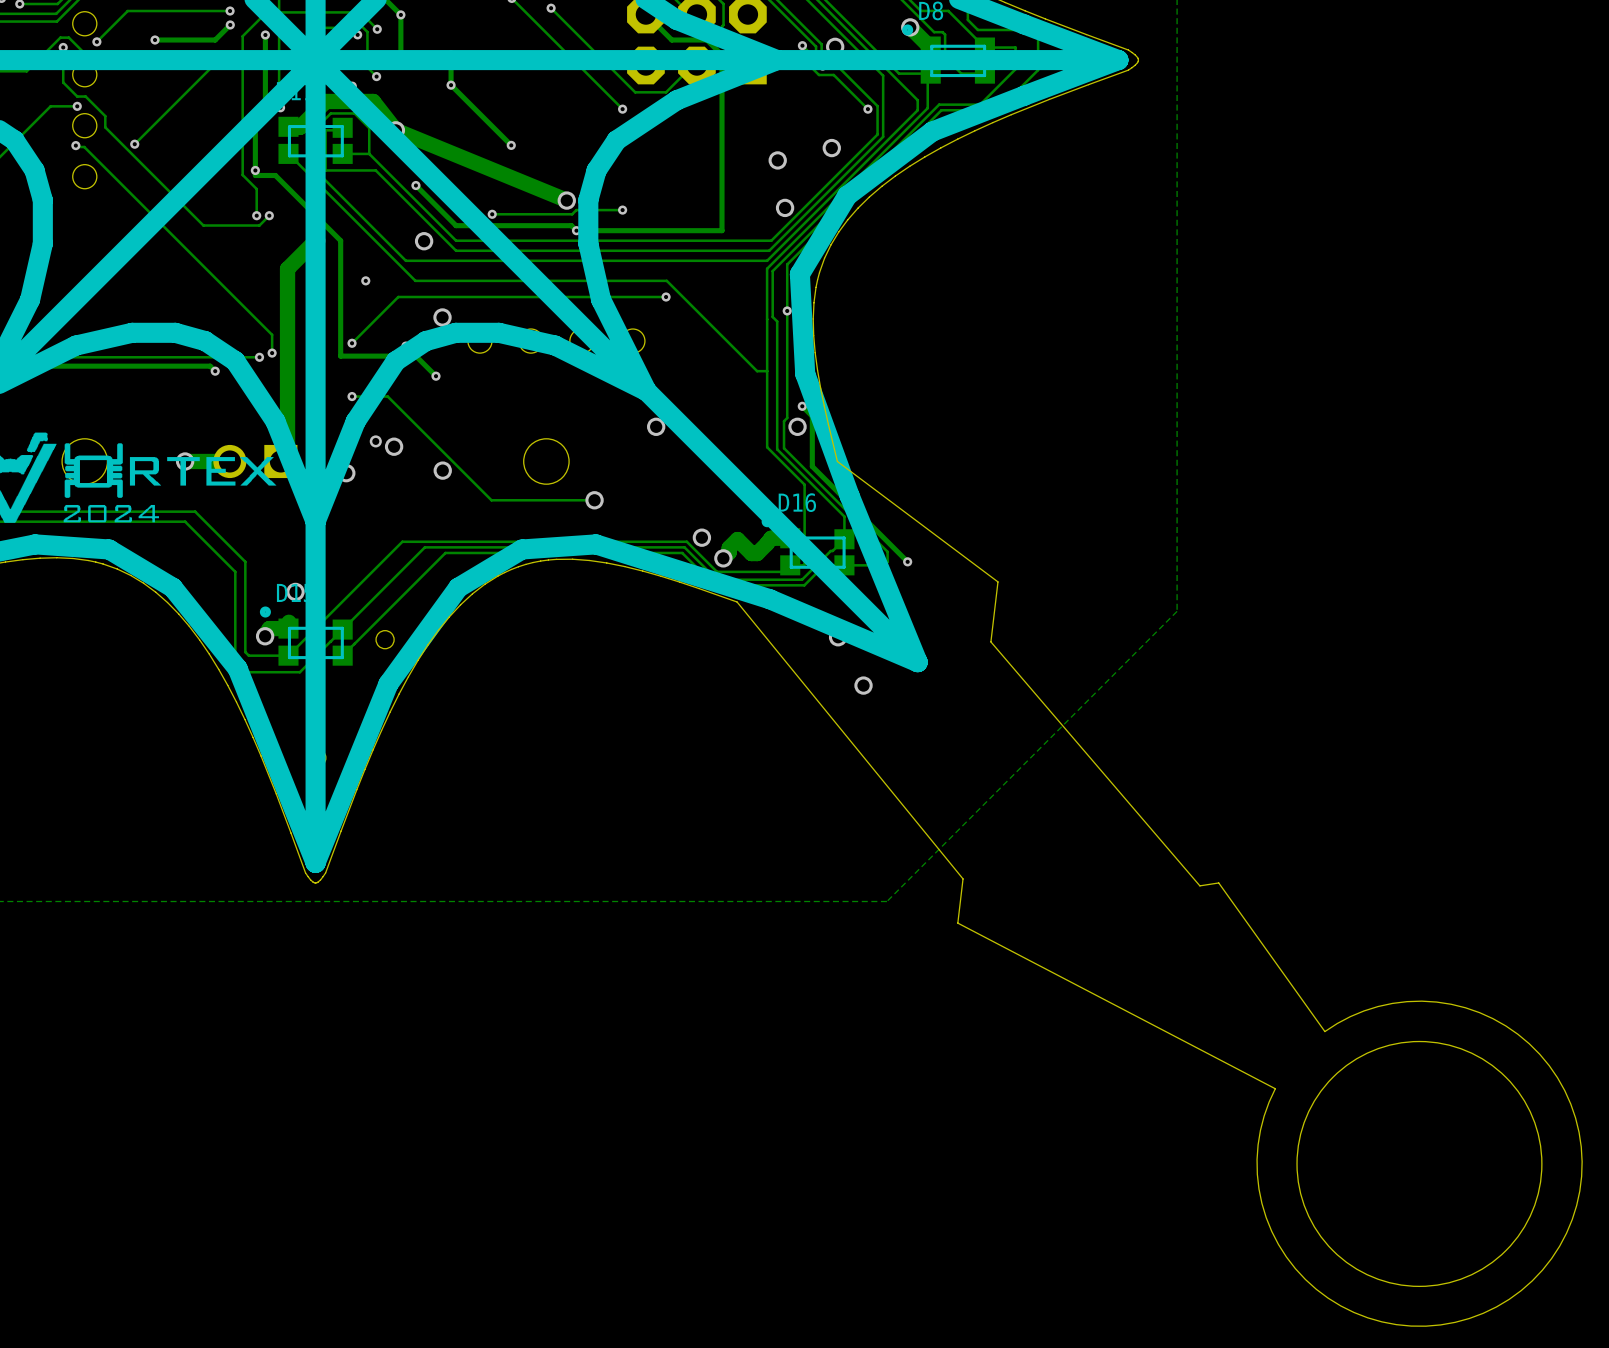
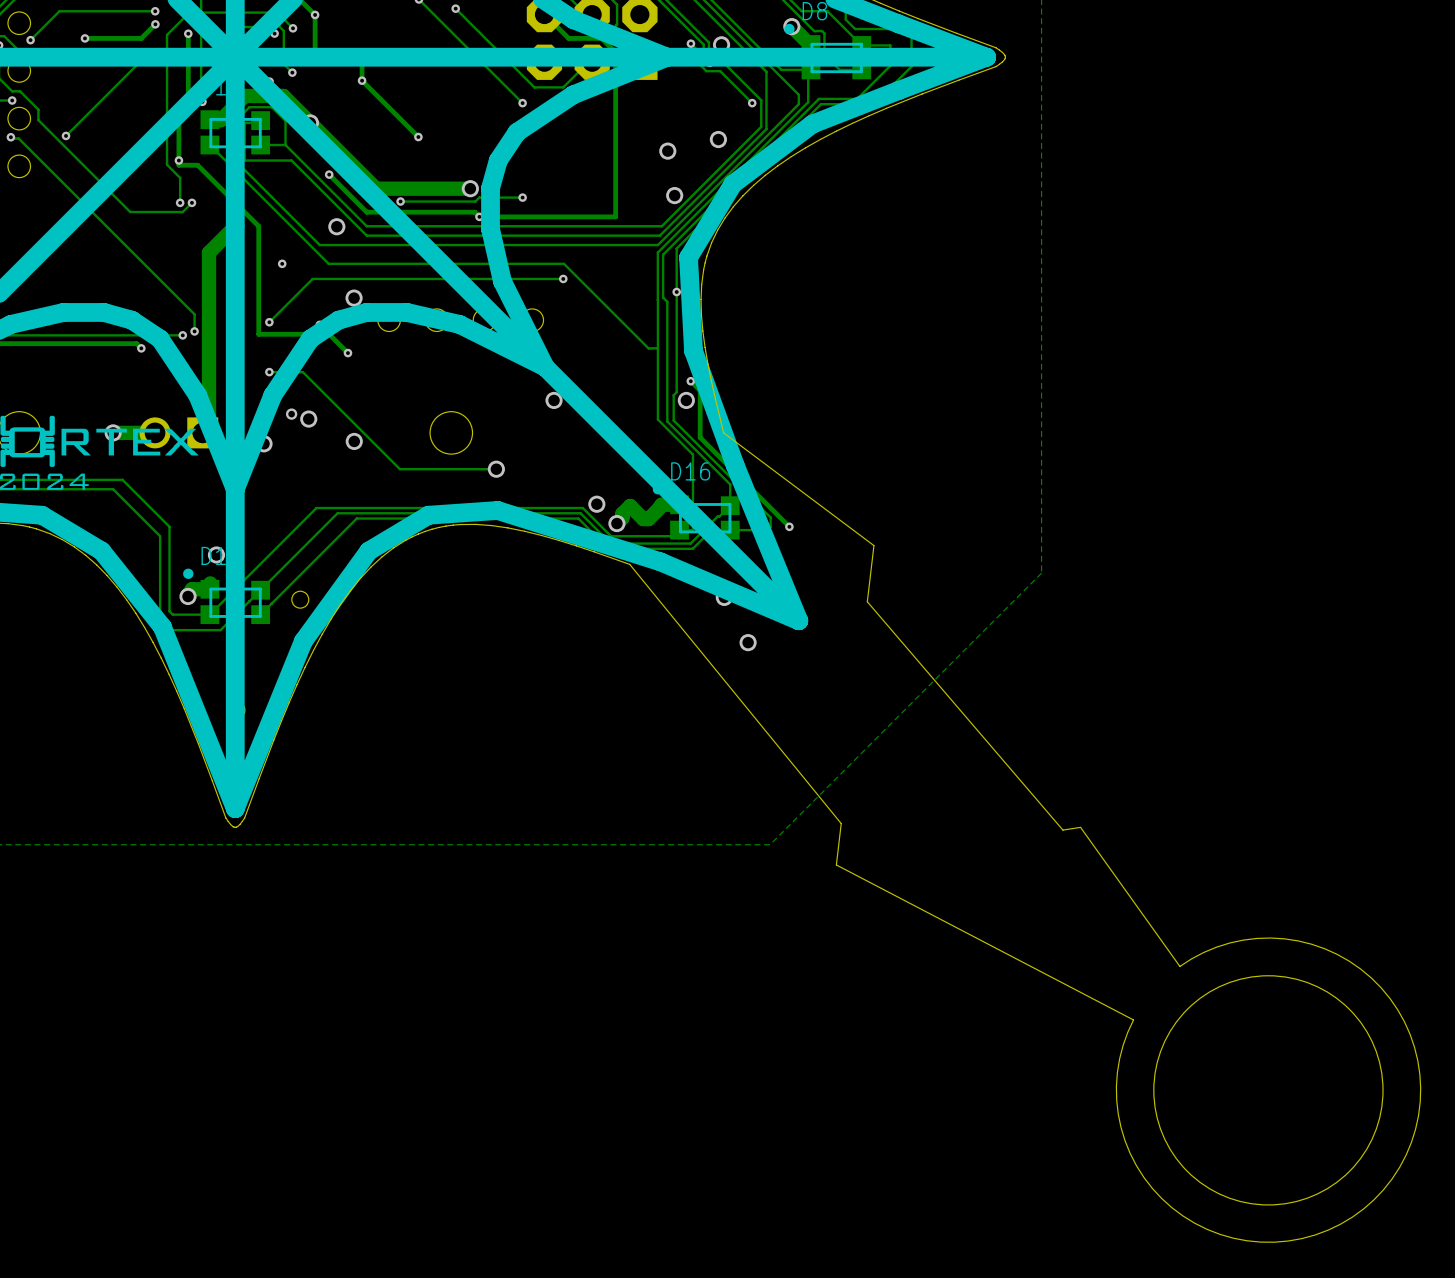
track: (367, 101) (373, 101) (395, 130) (566, 200) -> (283, 95) (376, 188) (470, 188)

